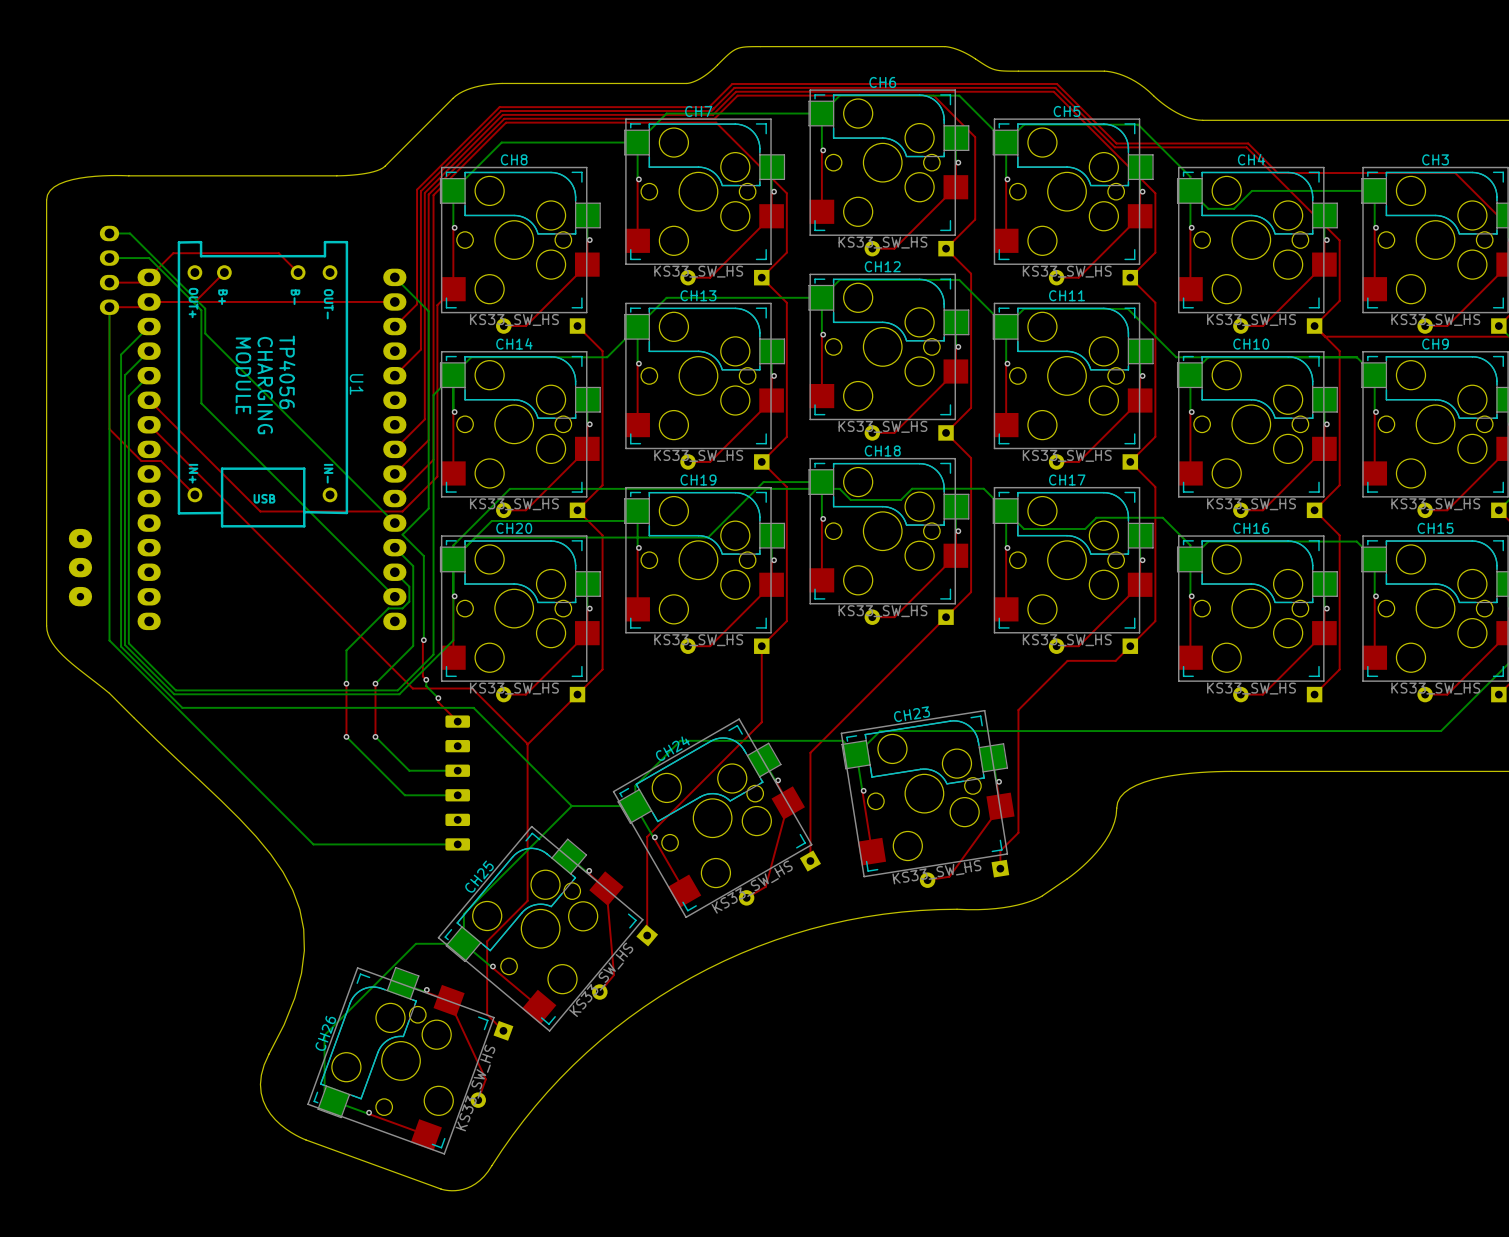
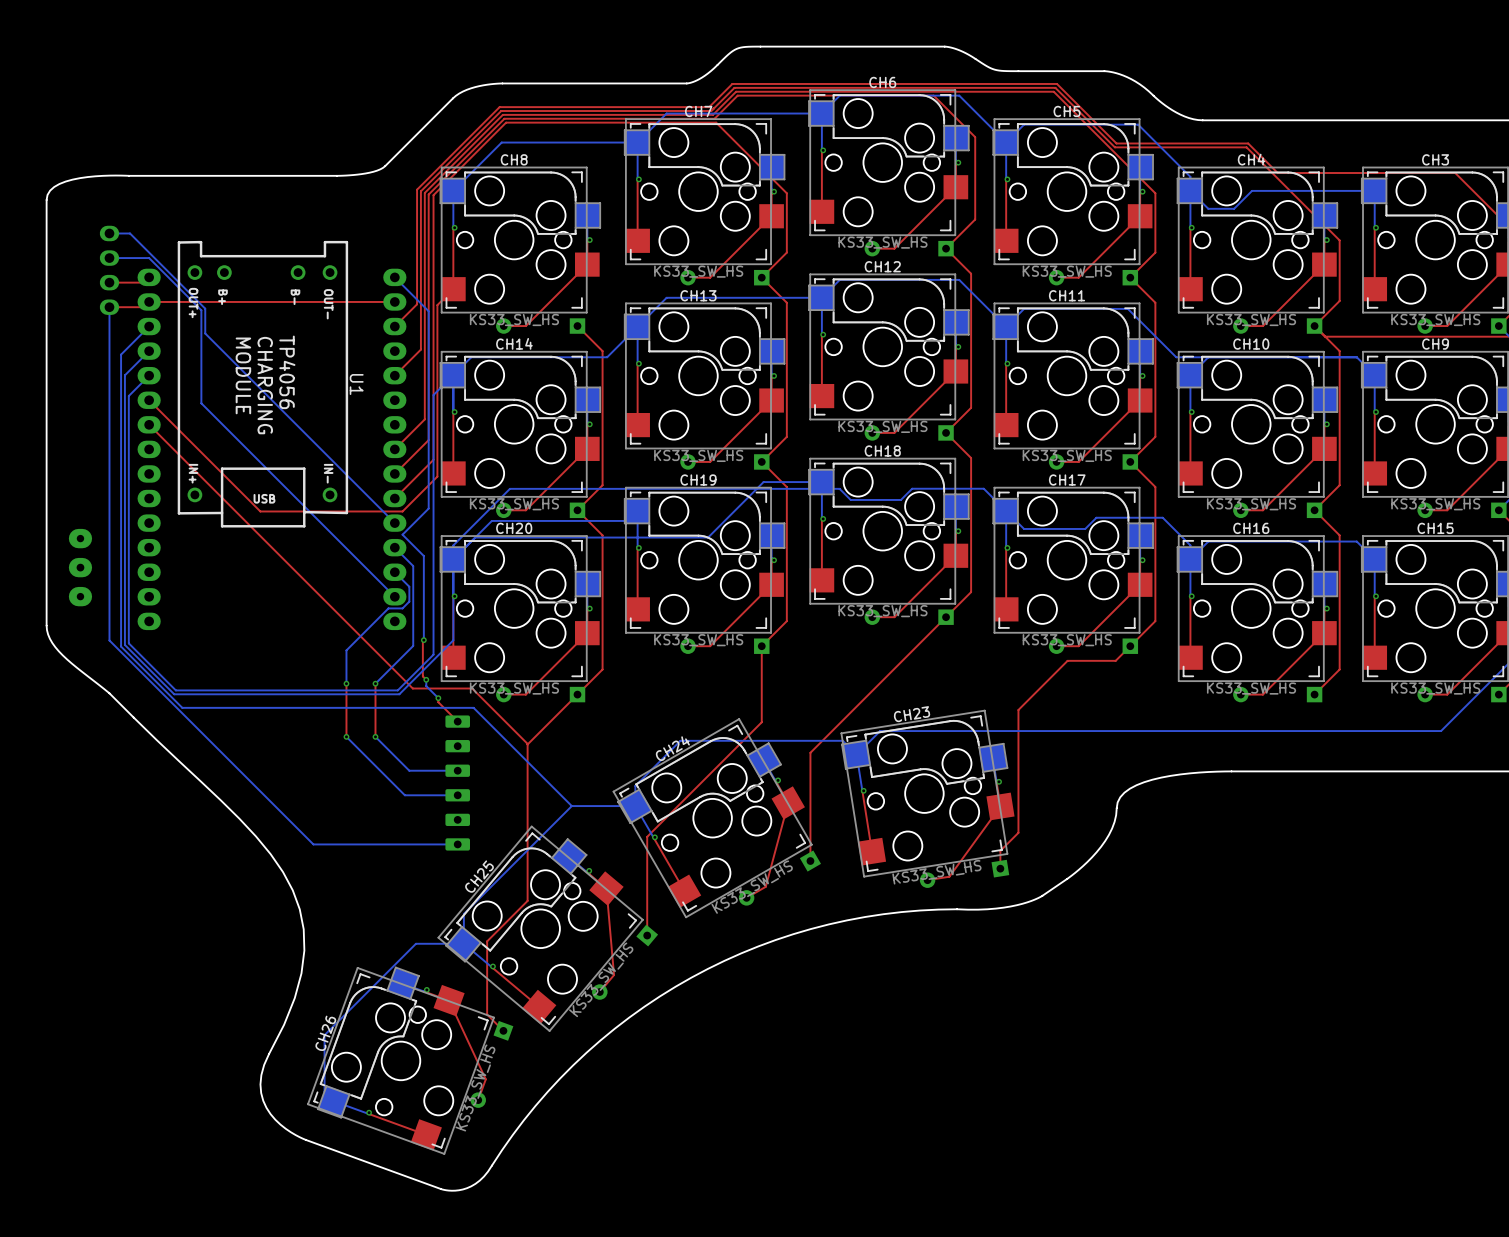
top track: (224, 272) (194, 301) -> none
top track: (298, 272) (278, 253) (173, 253) (149, 277) -> none
top track: (109, 307) (109, 429) (141, 461) (161, 461) (194, 494) -> none

